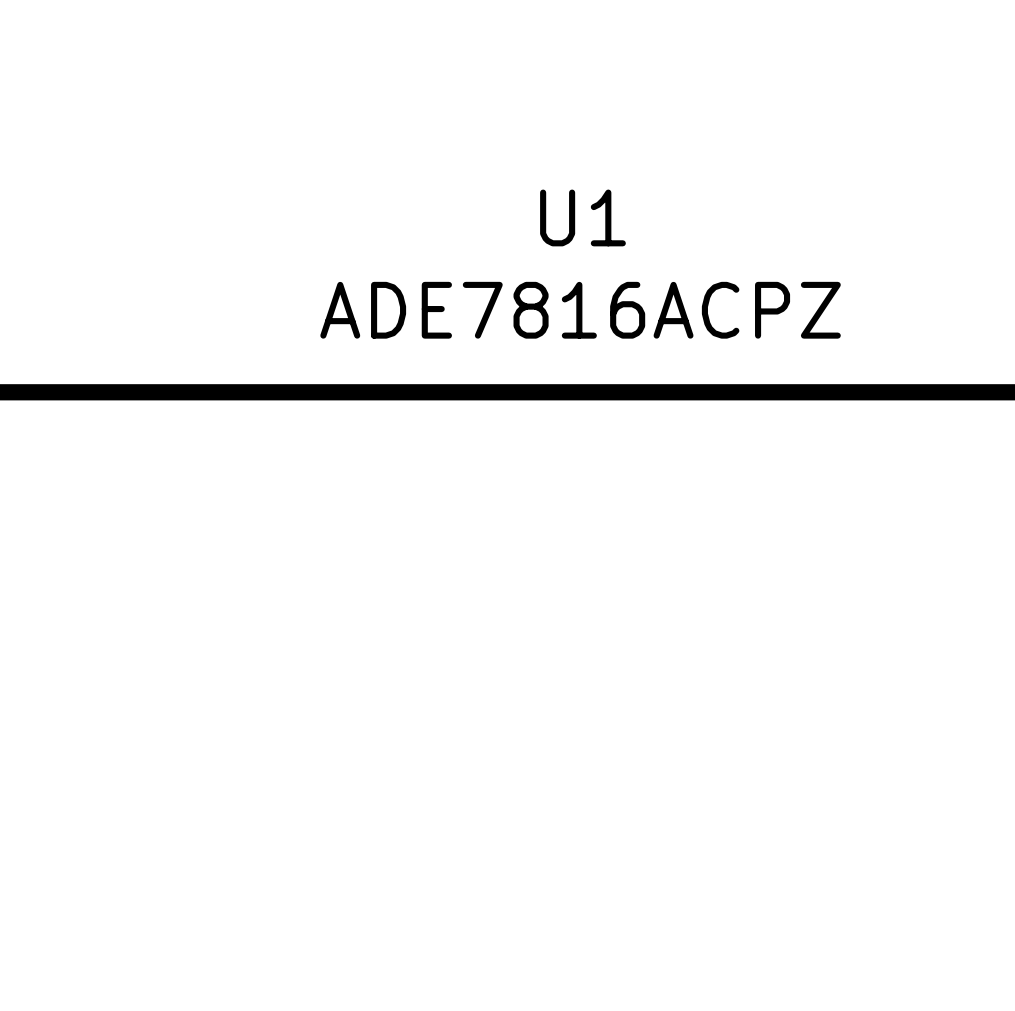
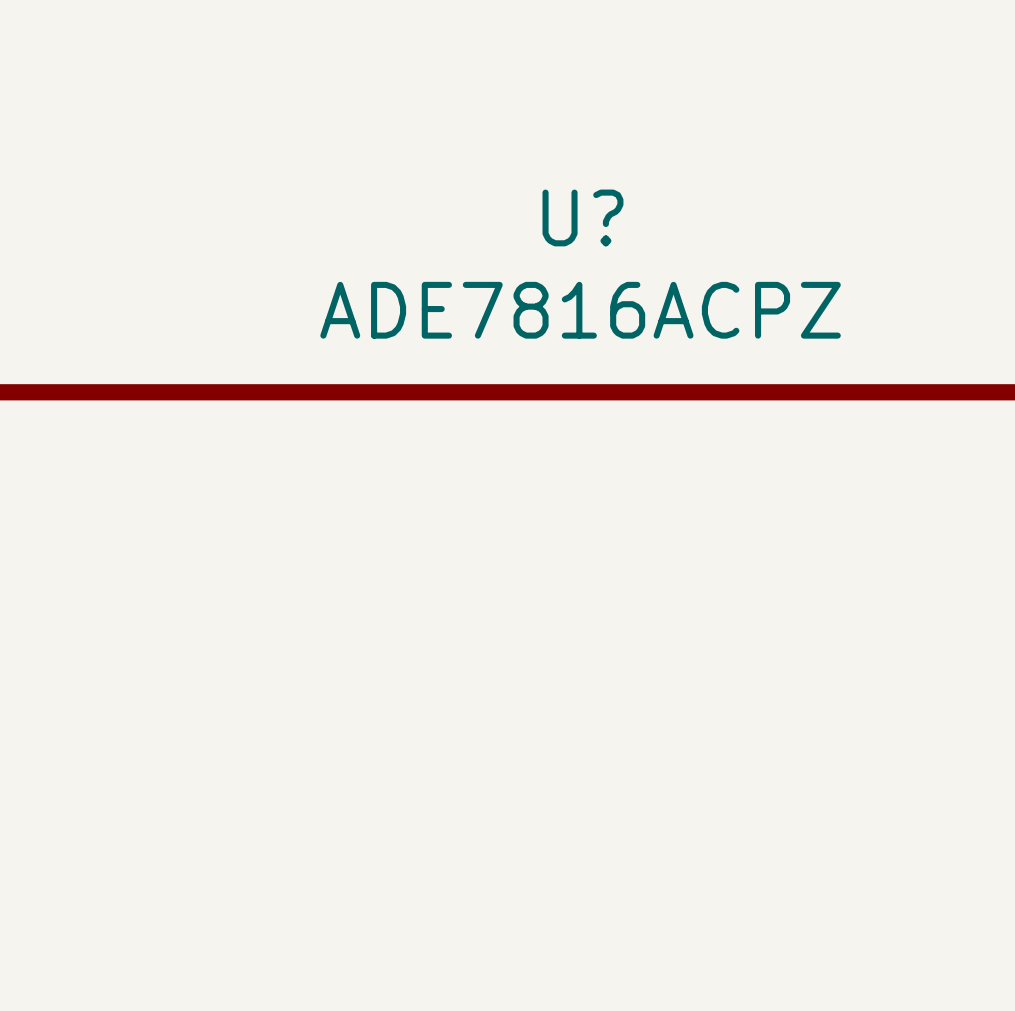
U1 name: U1 (582, 217) -> U? (582, 217)

